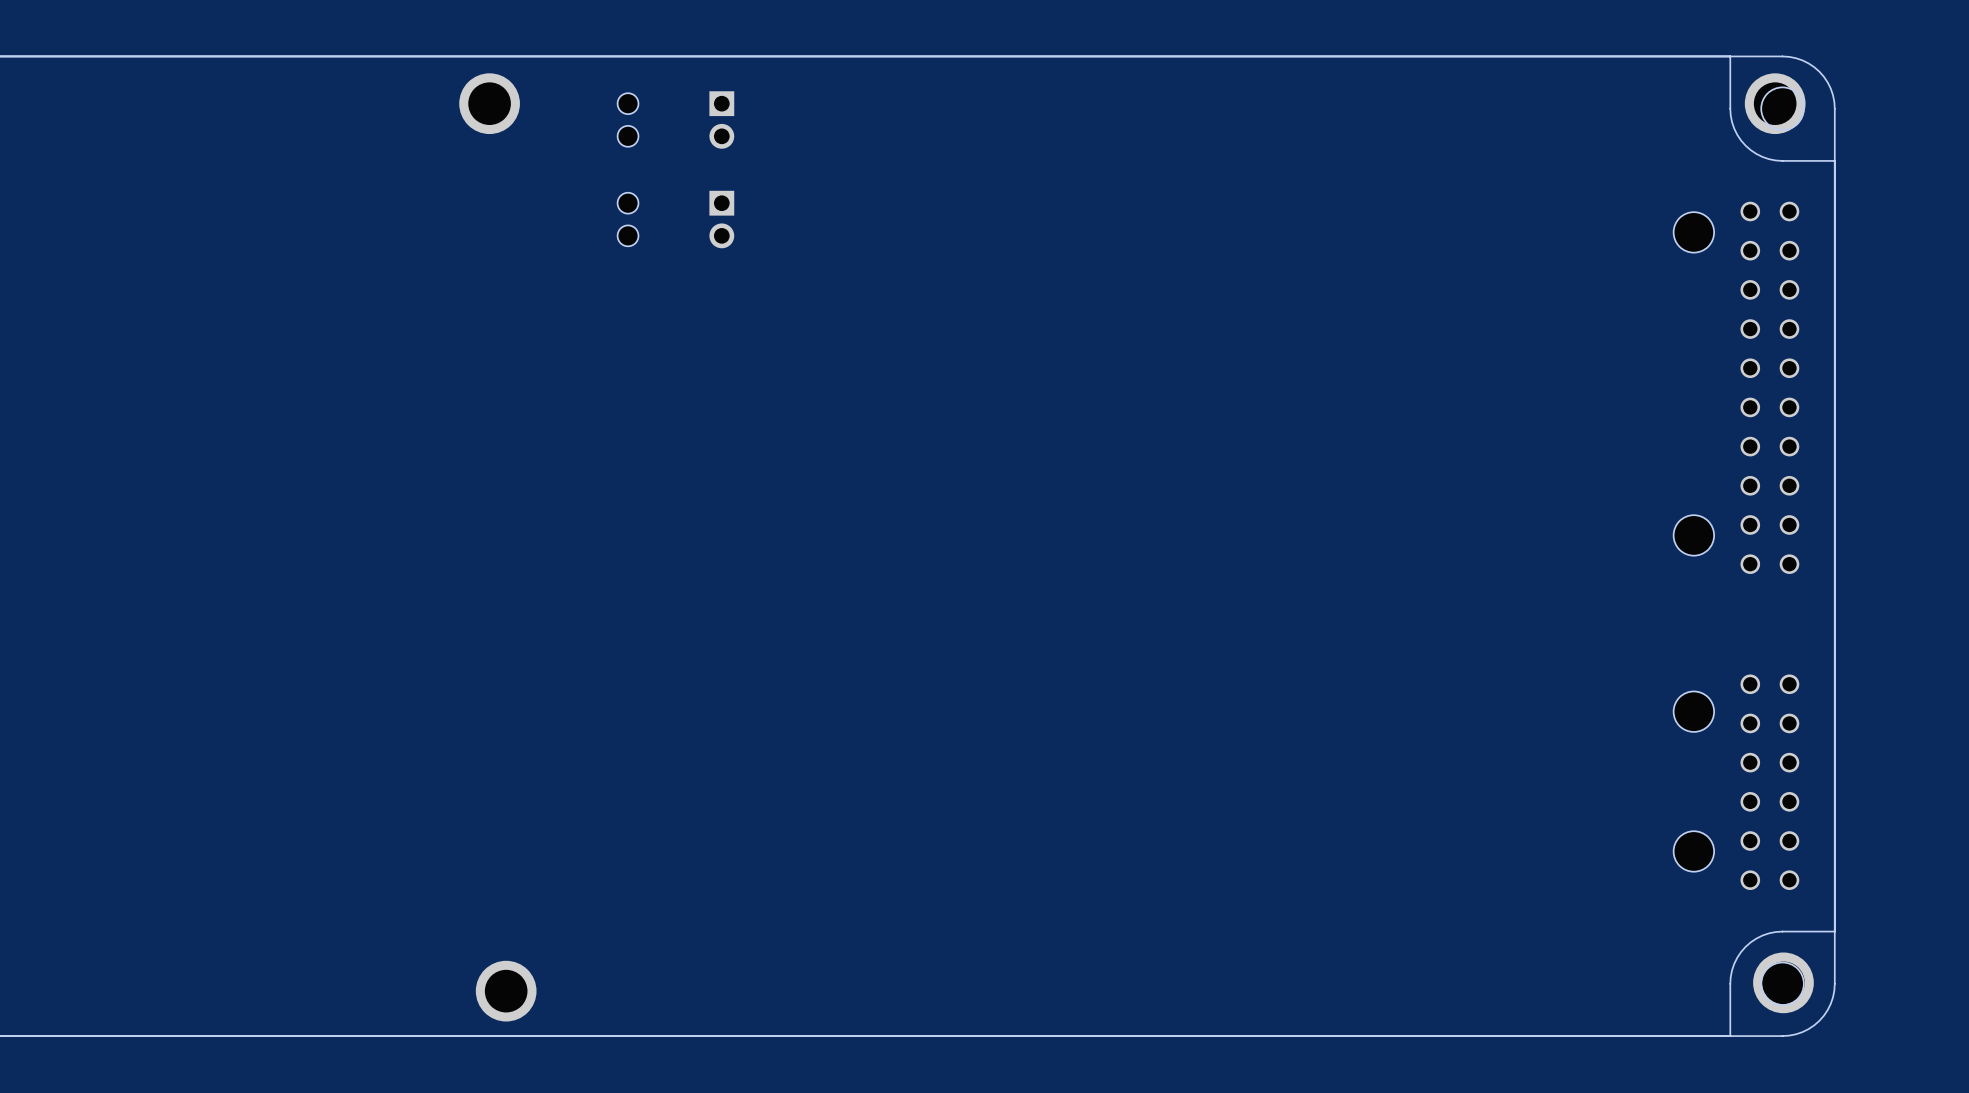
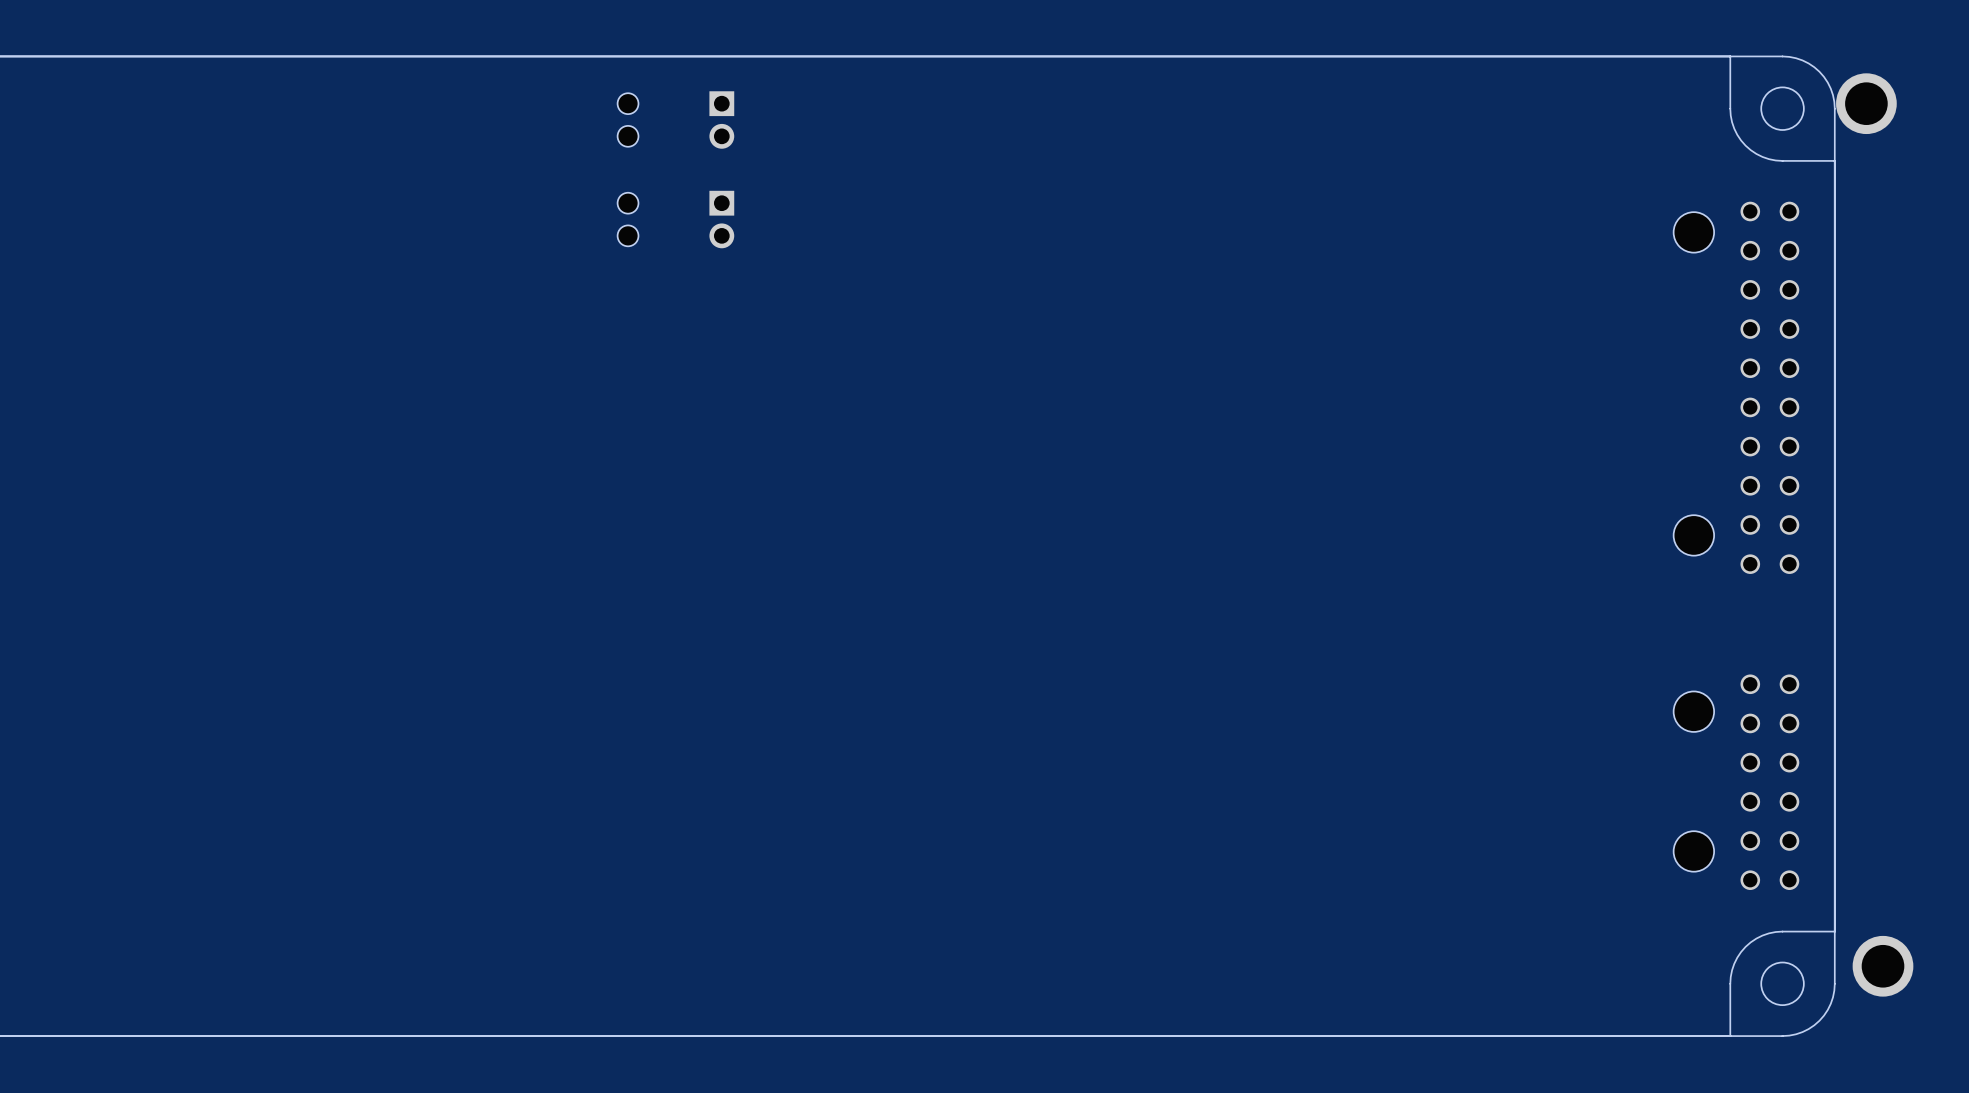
part: (489, 103) -> none
part position: (1775, 103) -> (1866, 103)
part position: (1783, 982) -> (1883, 966)
part: (506, 991) -> none

